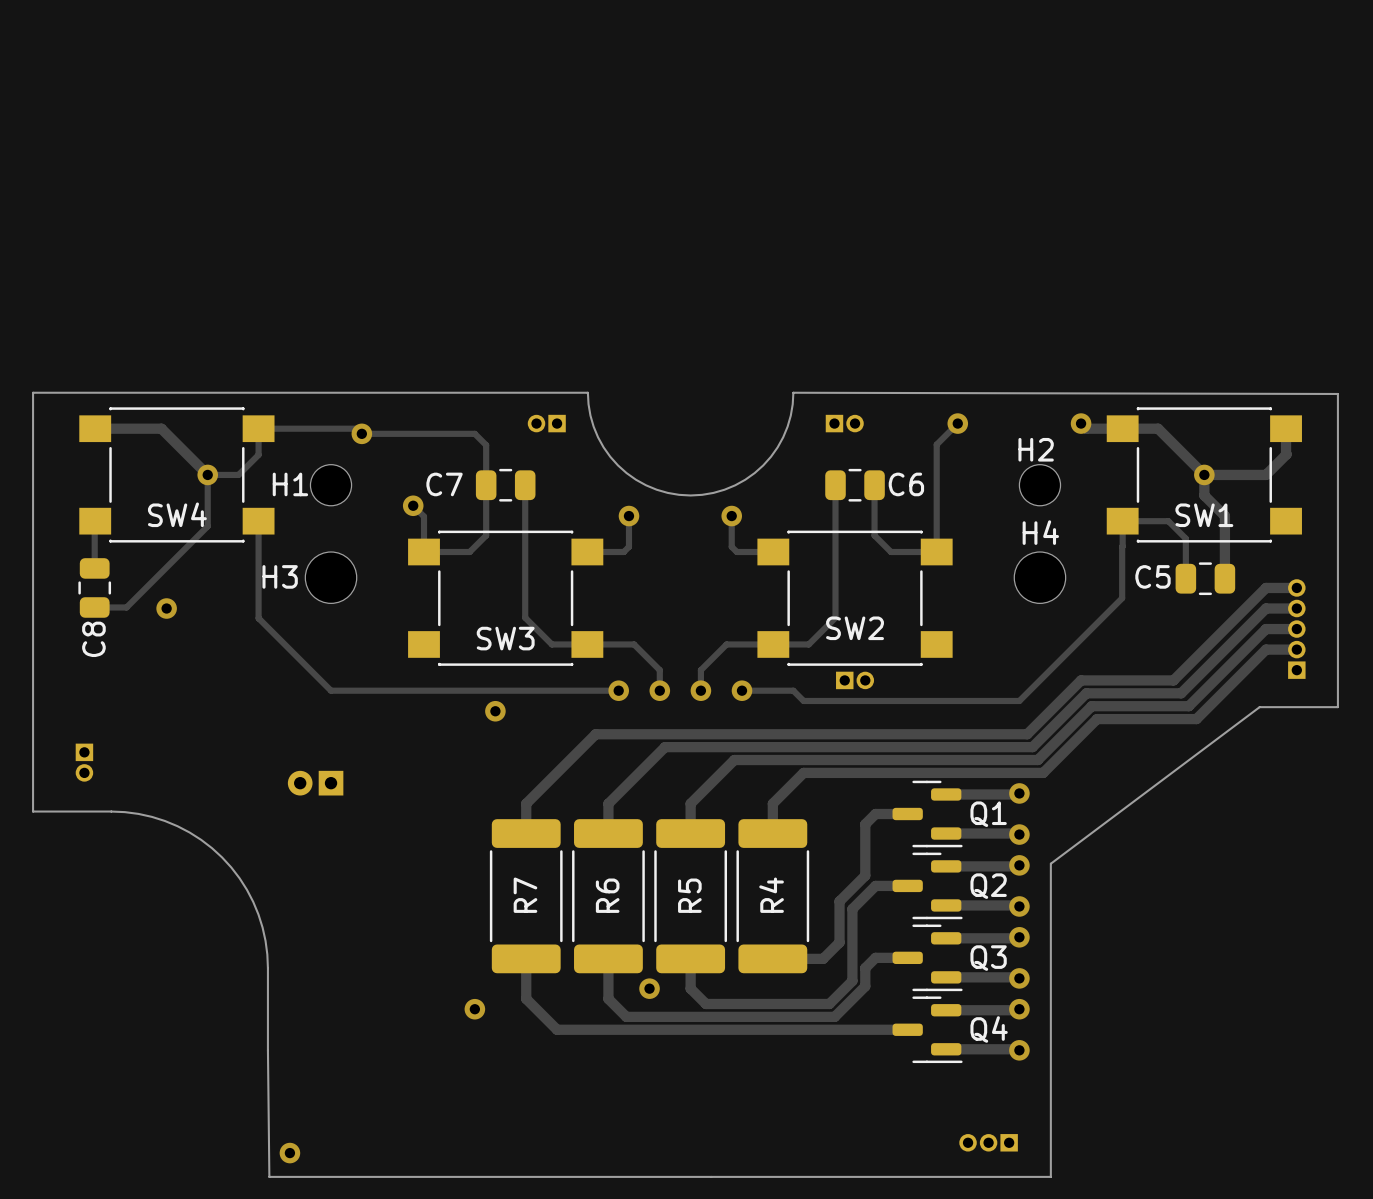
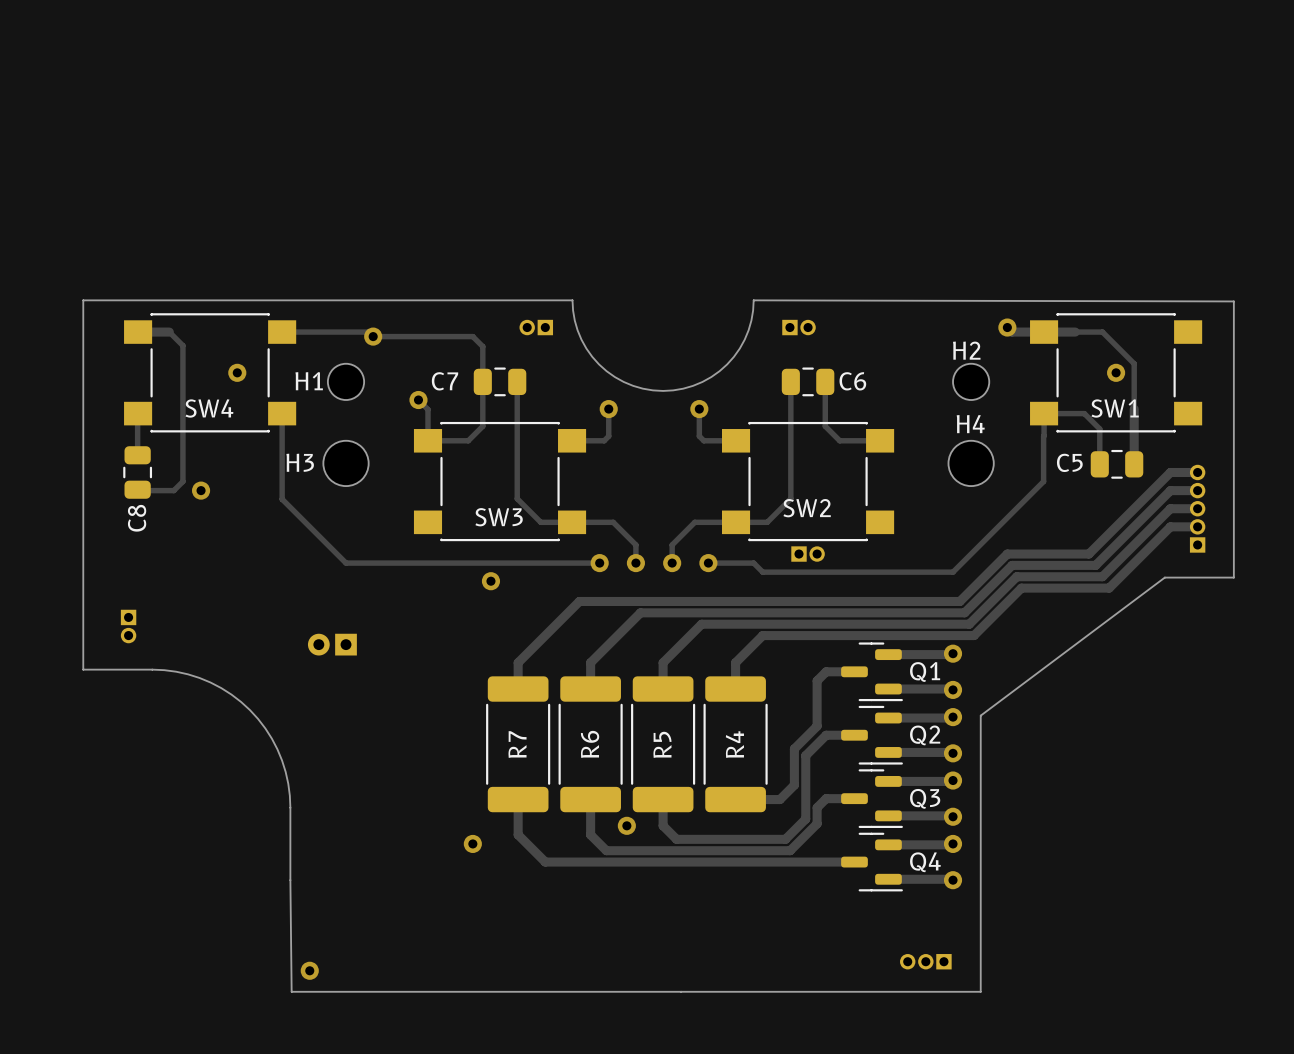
track: (957, 423) (936, 444) (936, 552) -> none
via: (957, 423) -> none
track: (130, 428) (161, 428) (207, 474) -> none
track: (258, 428) (258, 454) (238, 474) (207, 474) -> none
track: (1158, 428) (1204, 474) -> (1075, 332) (1102, 332) (1134, 363) (1134, 409)
track: (1286, 428) (1286, 454) (1266, 474) (1204, 474) -> none
track: (207, 474) (207, 526) (126, 607) (94, 607) -> (169, 332) (182, 345) (182, 481) (173, 490) (137, 489)
track: (1204, 474) (1204, 495) (1224, 516) -> none

